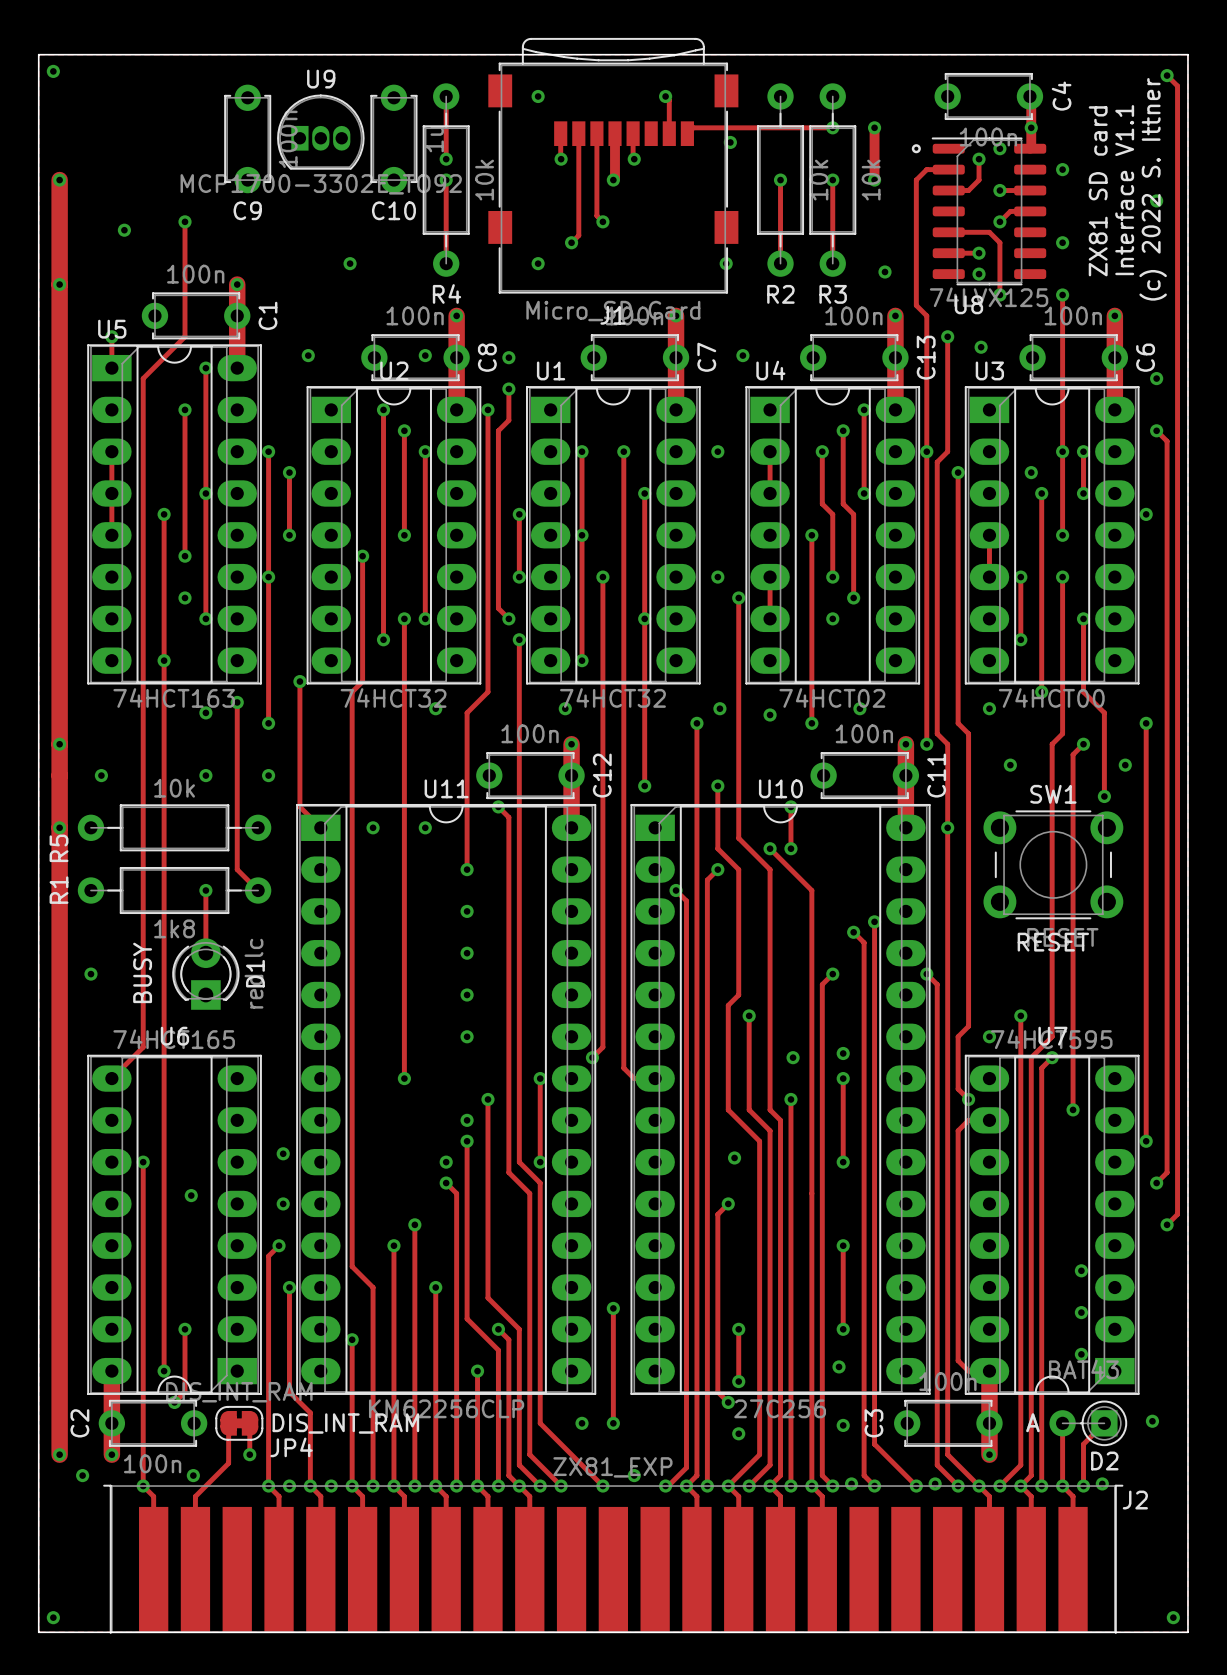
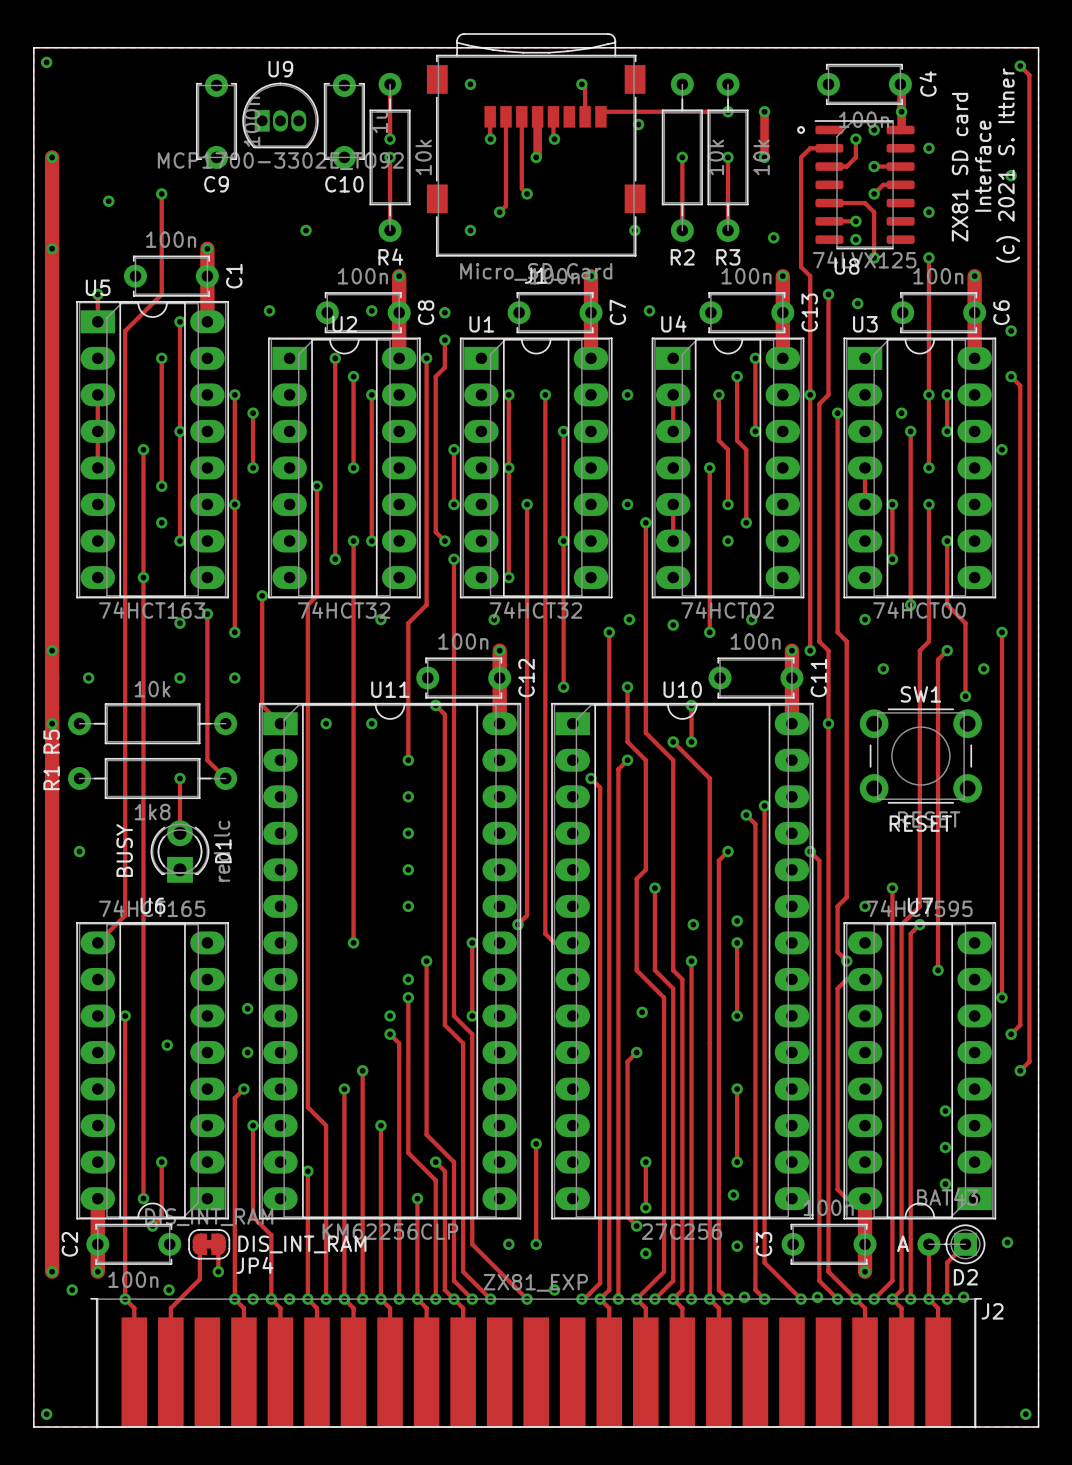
text: (c) 2022 S. Ittner (1153, 189) -> (c) 2021 S. Ittner (1008, 165)
text: Interface V1.1 (1124, 190) -> Interface (983, 166)

